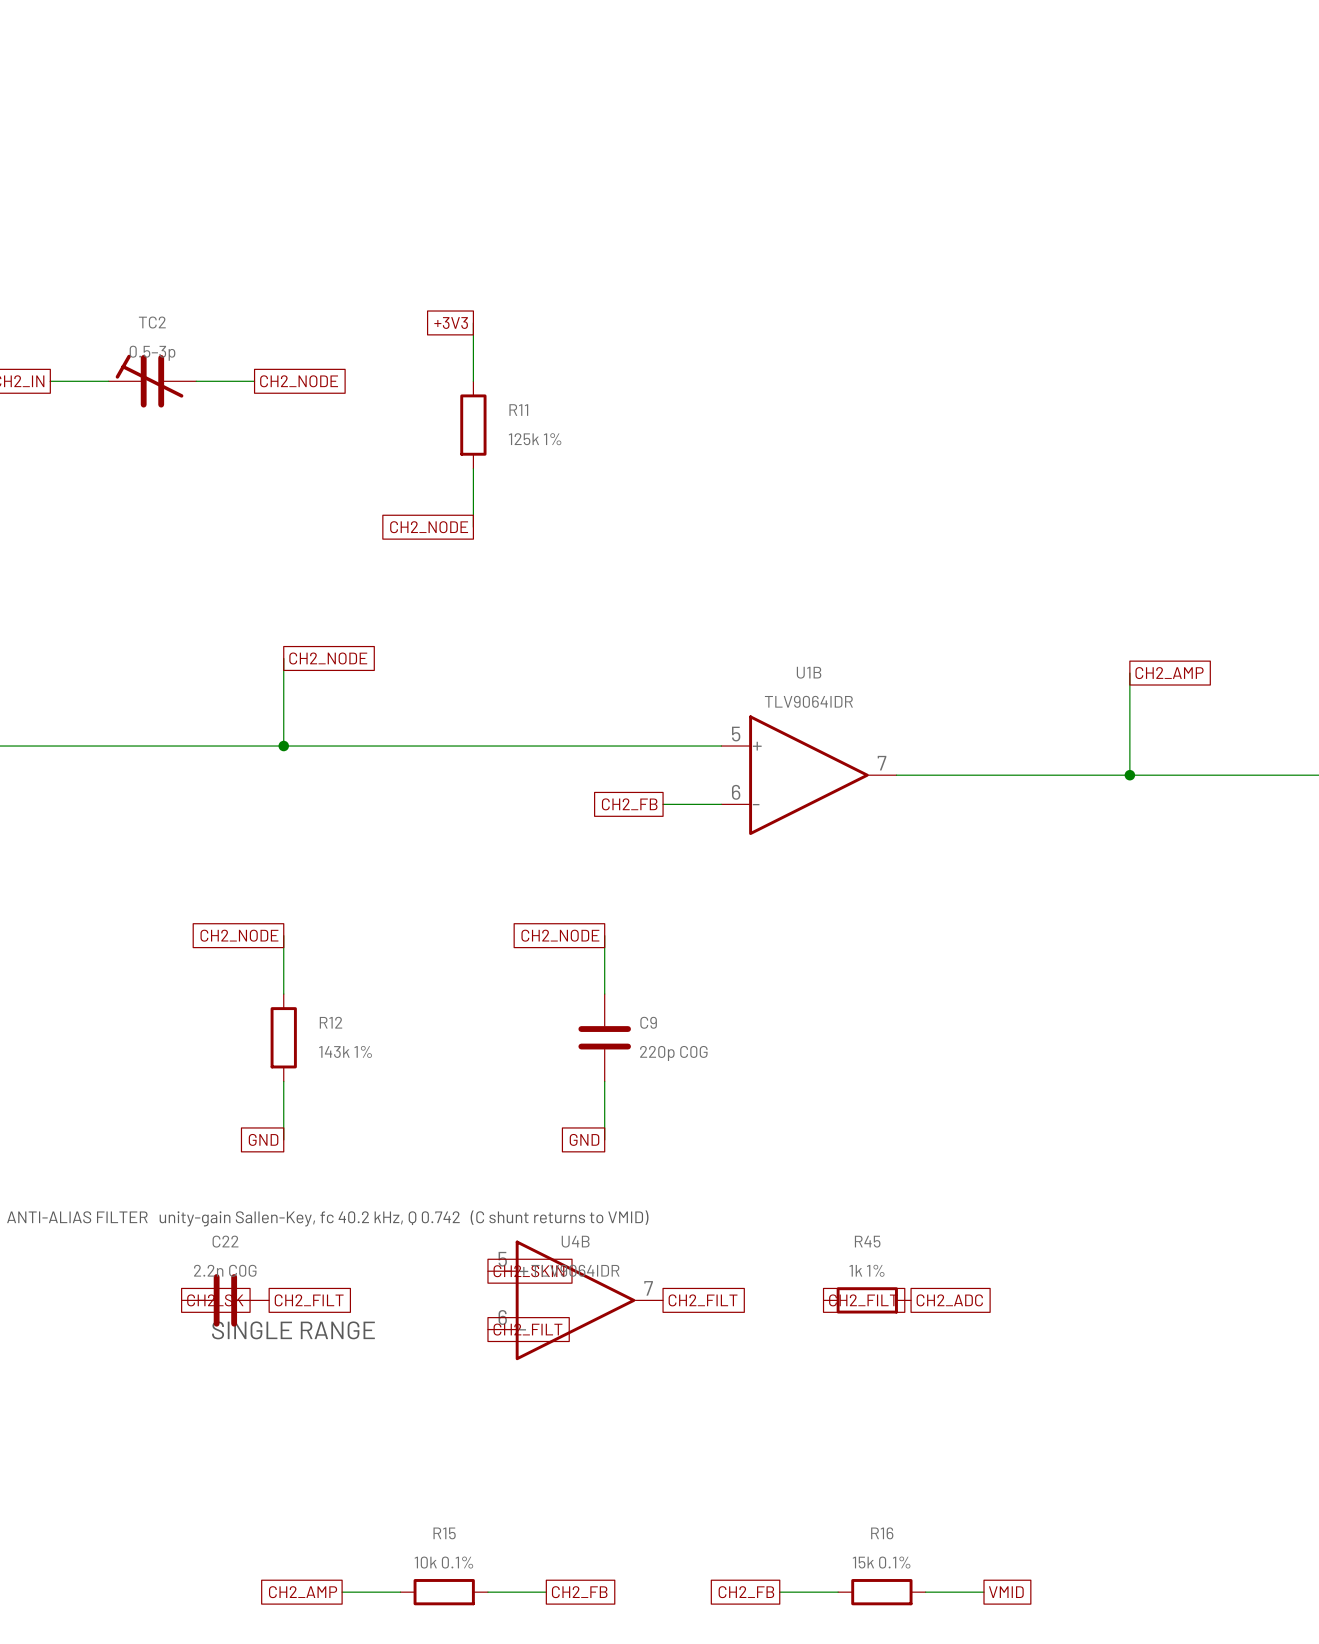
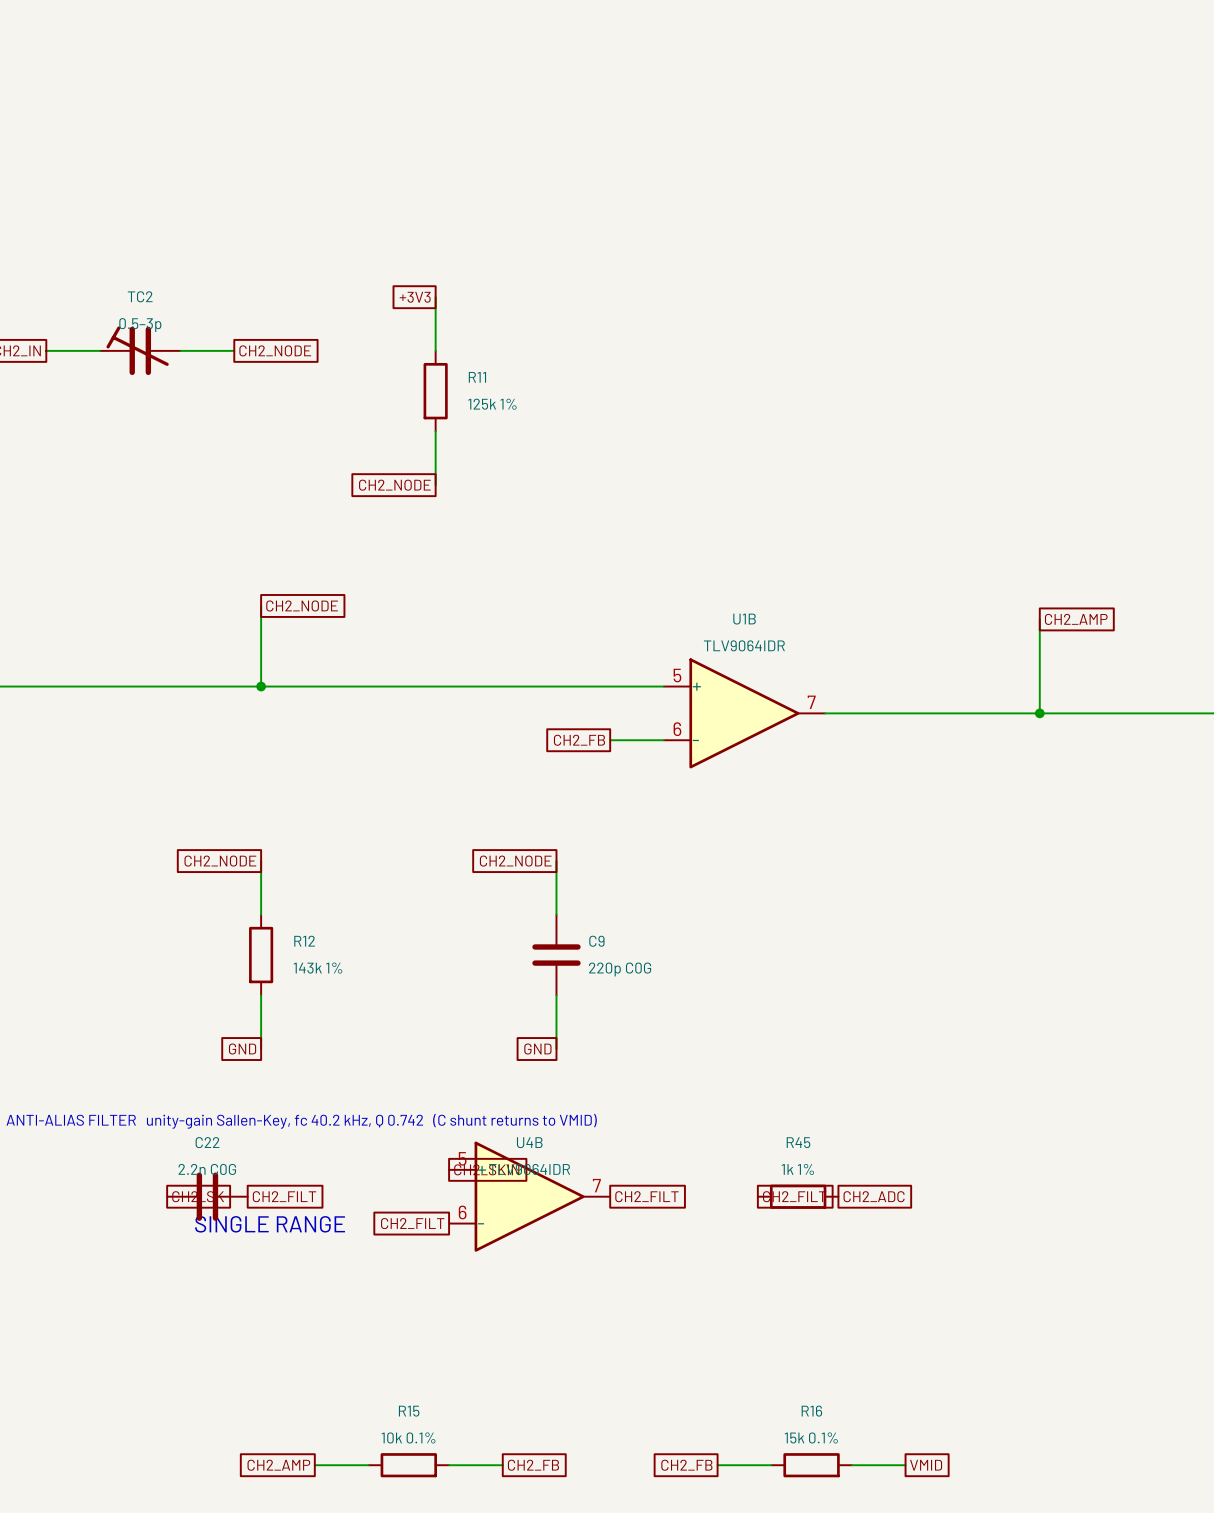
global label rotation: 0° (527, 1329) -> 180° (412, 1223)
global label position: CH2_FILT (527, 1329) -> CH2_FILT (412, 1223)

